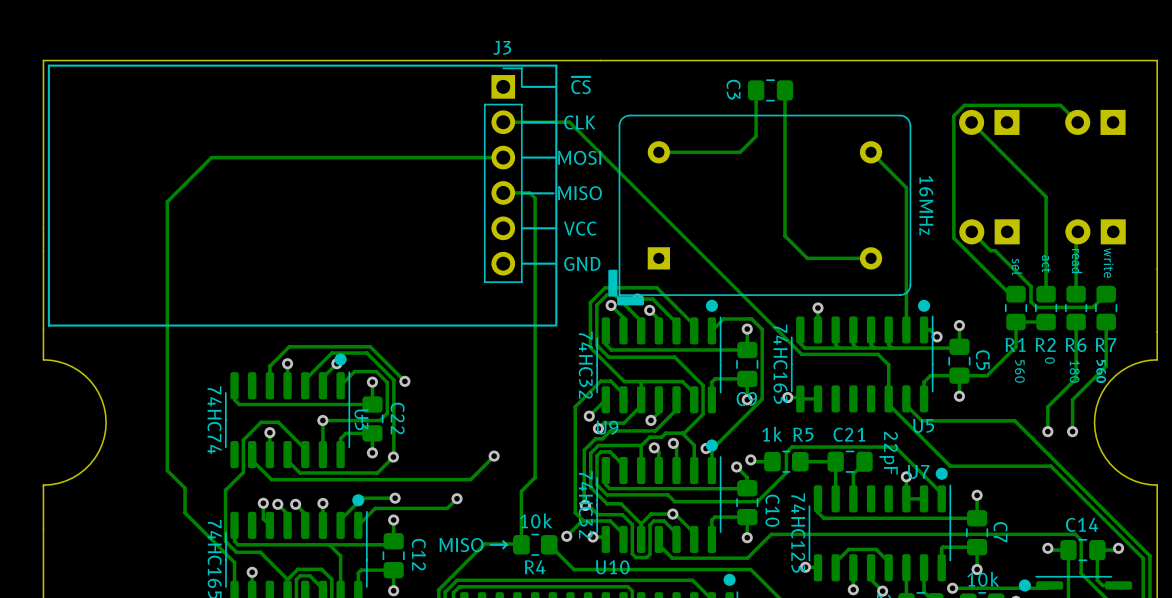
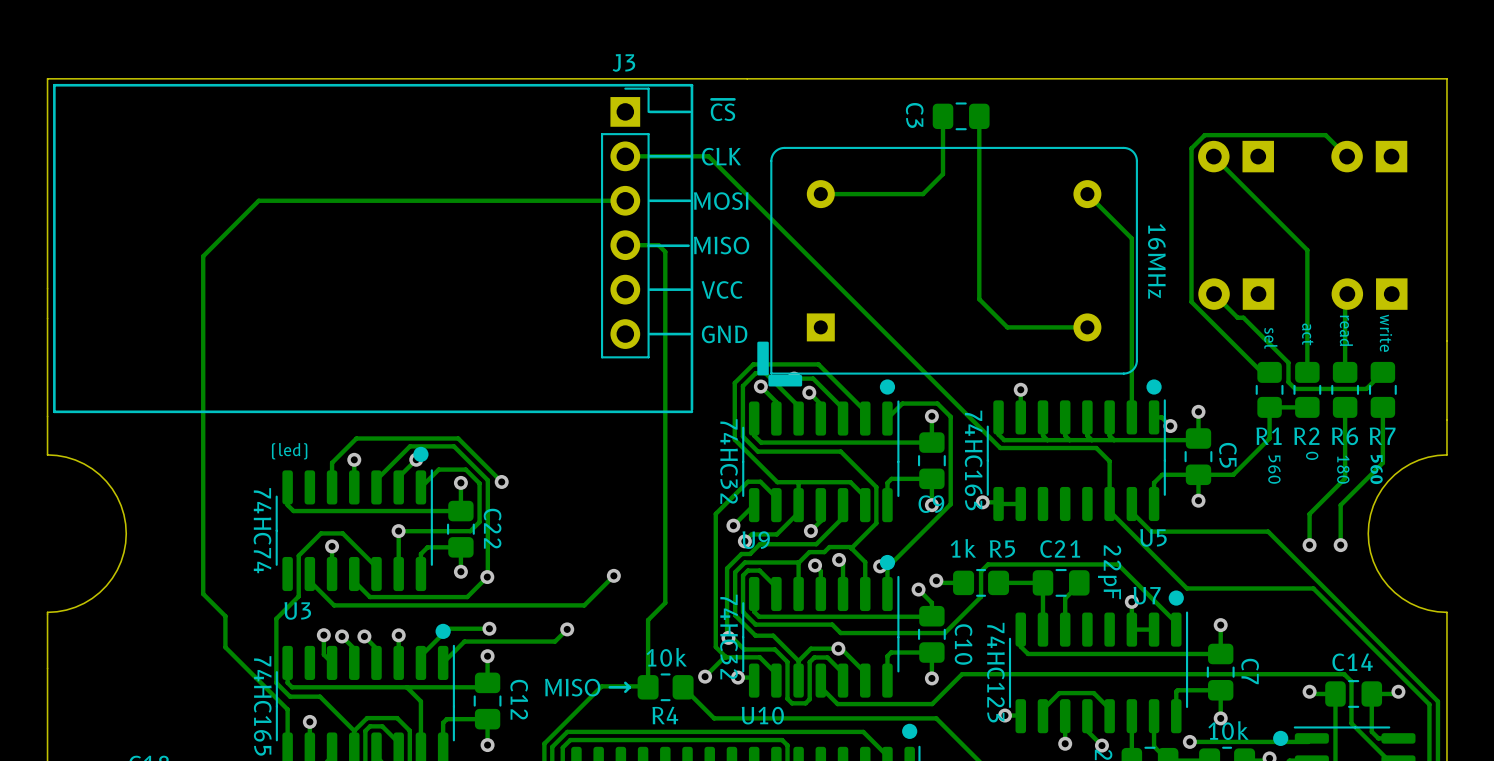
text: none -> (led) (289, 451)
U3 name rotation: 0° (361, 419) -> 90° counterclockwise (297, 610)
U3 name position: U3 (361, 419) -> U3 (297, 610)

